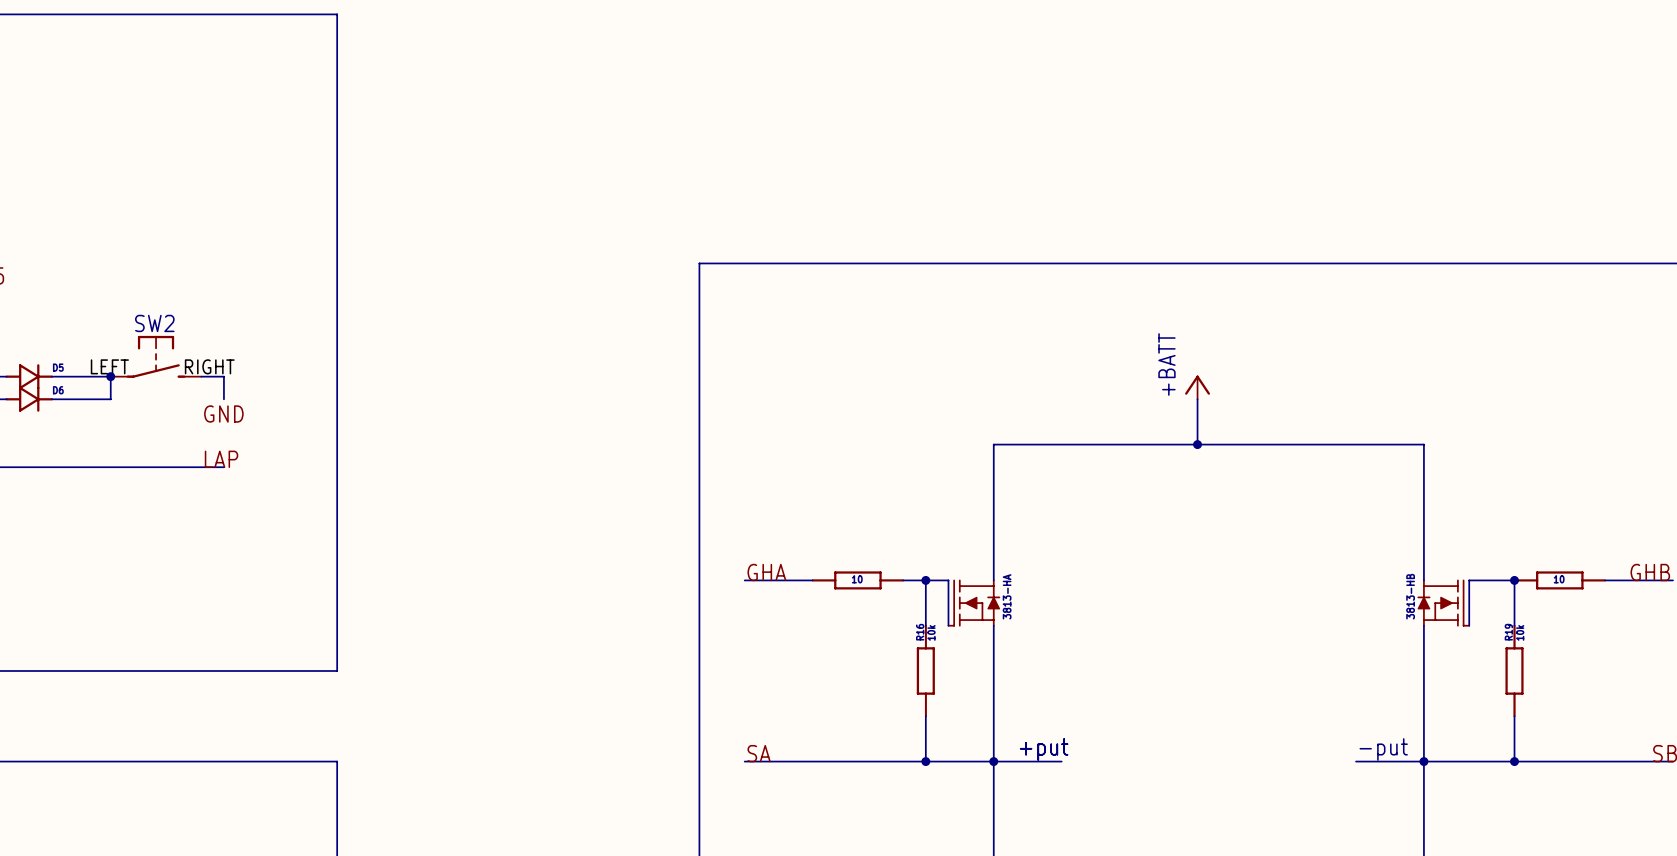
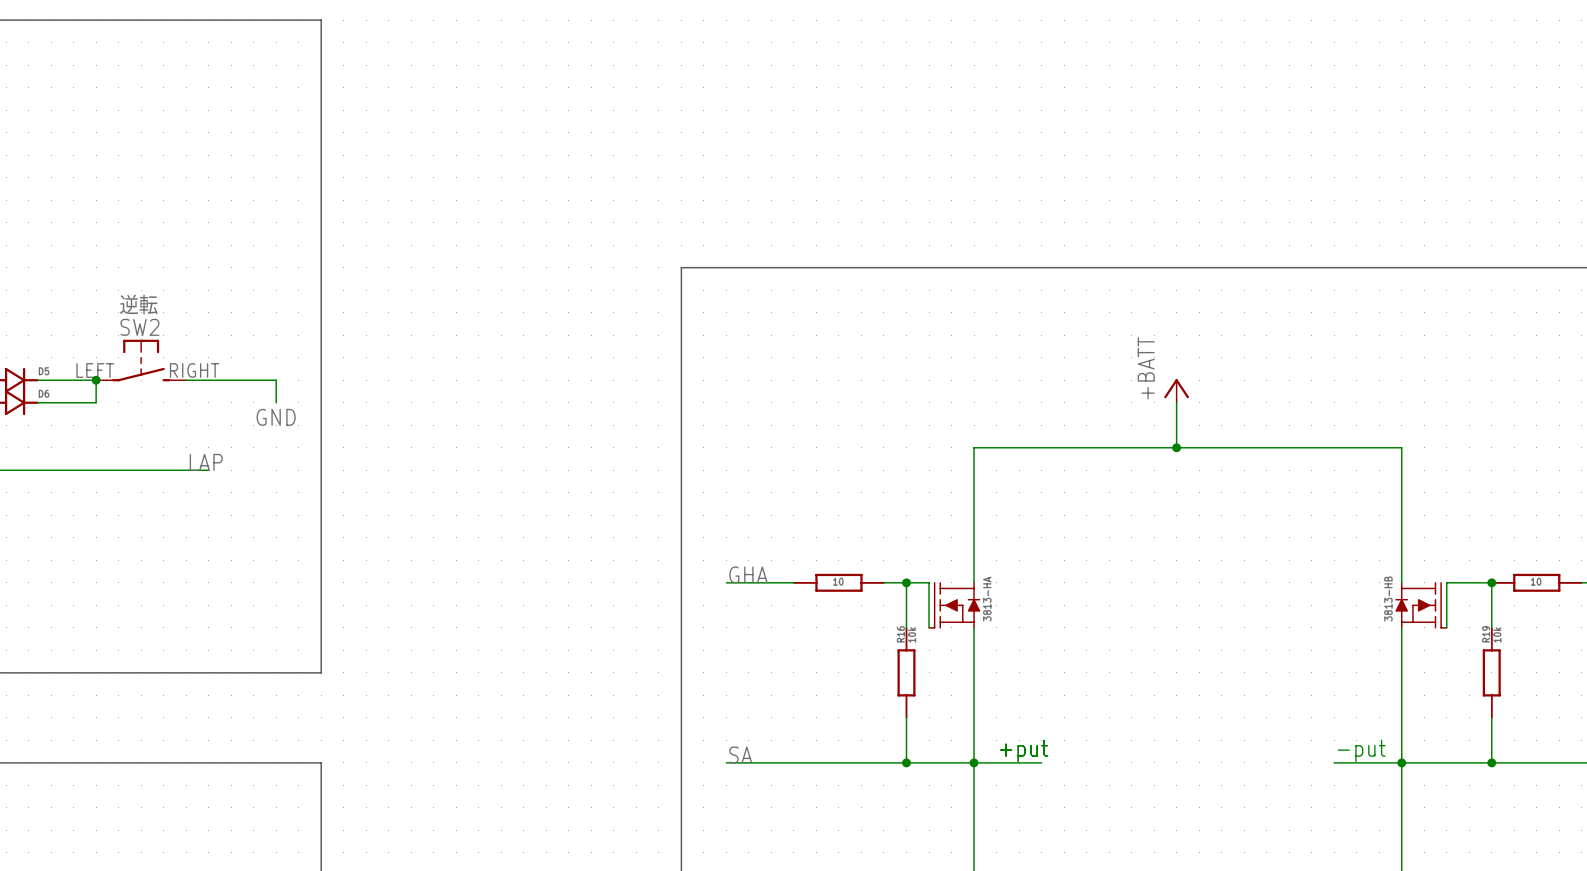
text: none -> 逆転 (138, 304)
wire: (223, 376) (223, 399) -> (208, 380) (276, 380) (276, 402)
label position: GND (223, 414) -> GND (276, 417)

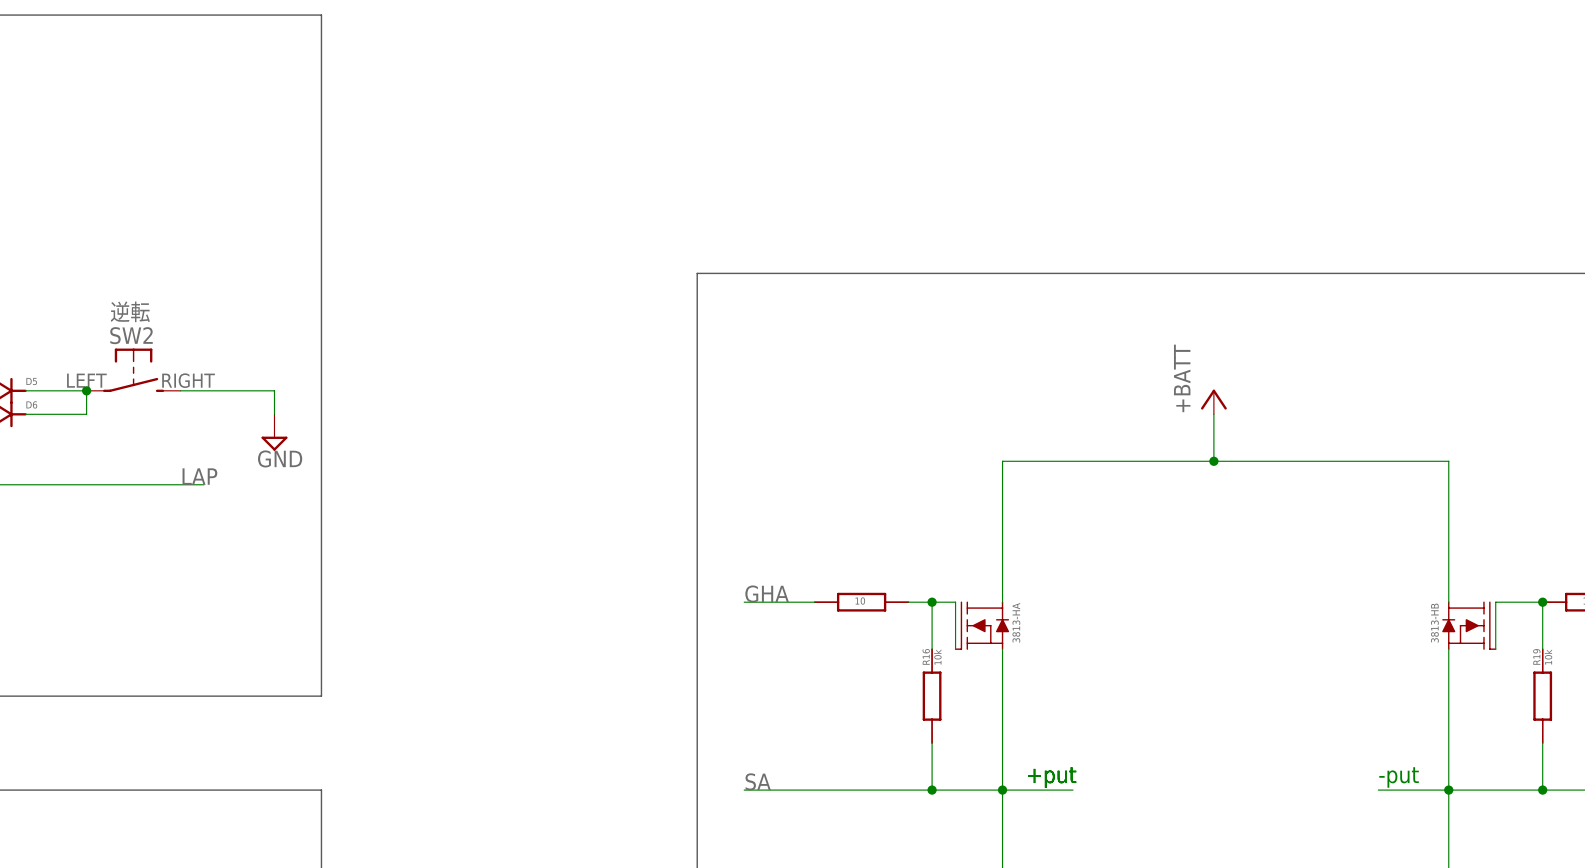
label: GND (276, 417) -> none
power symbol: none -> GND (274, 432)

